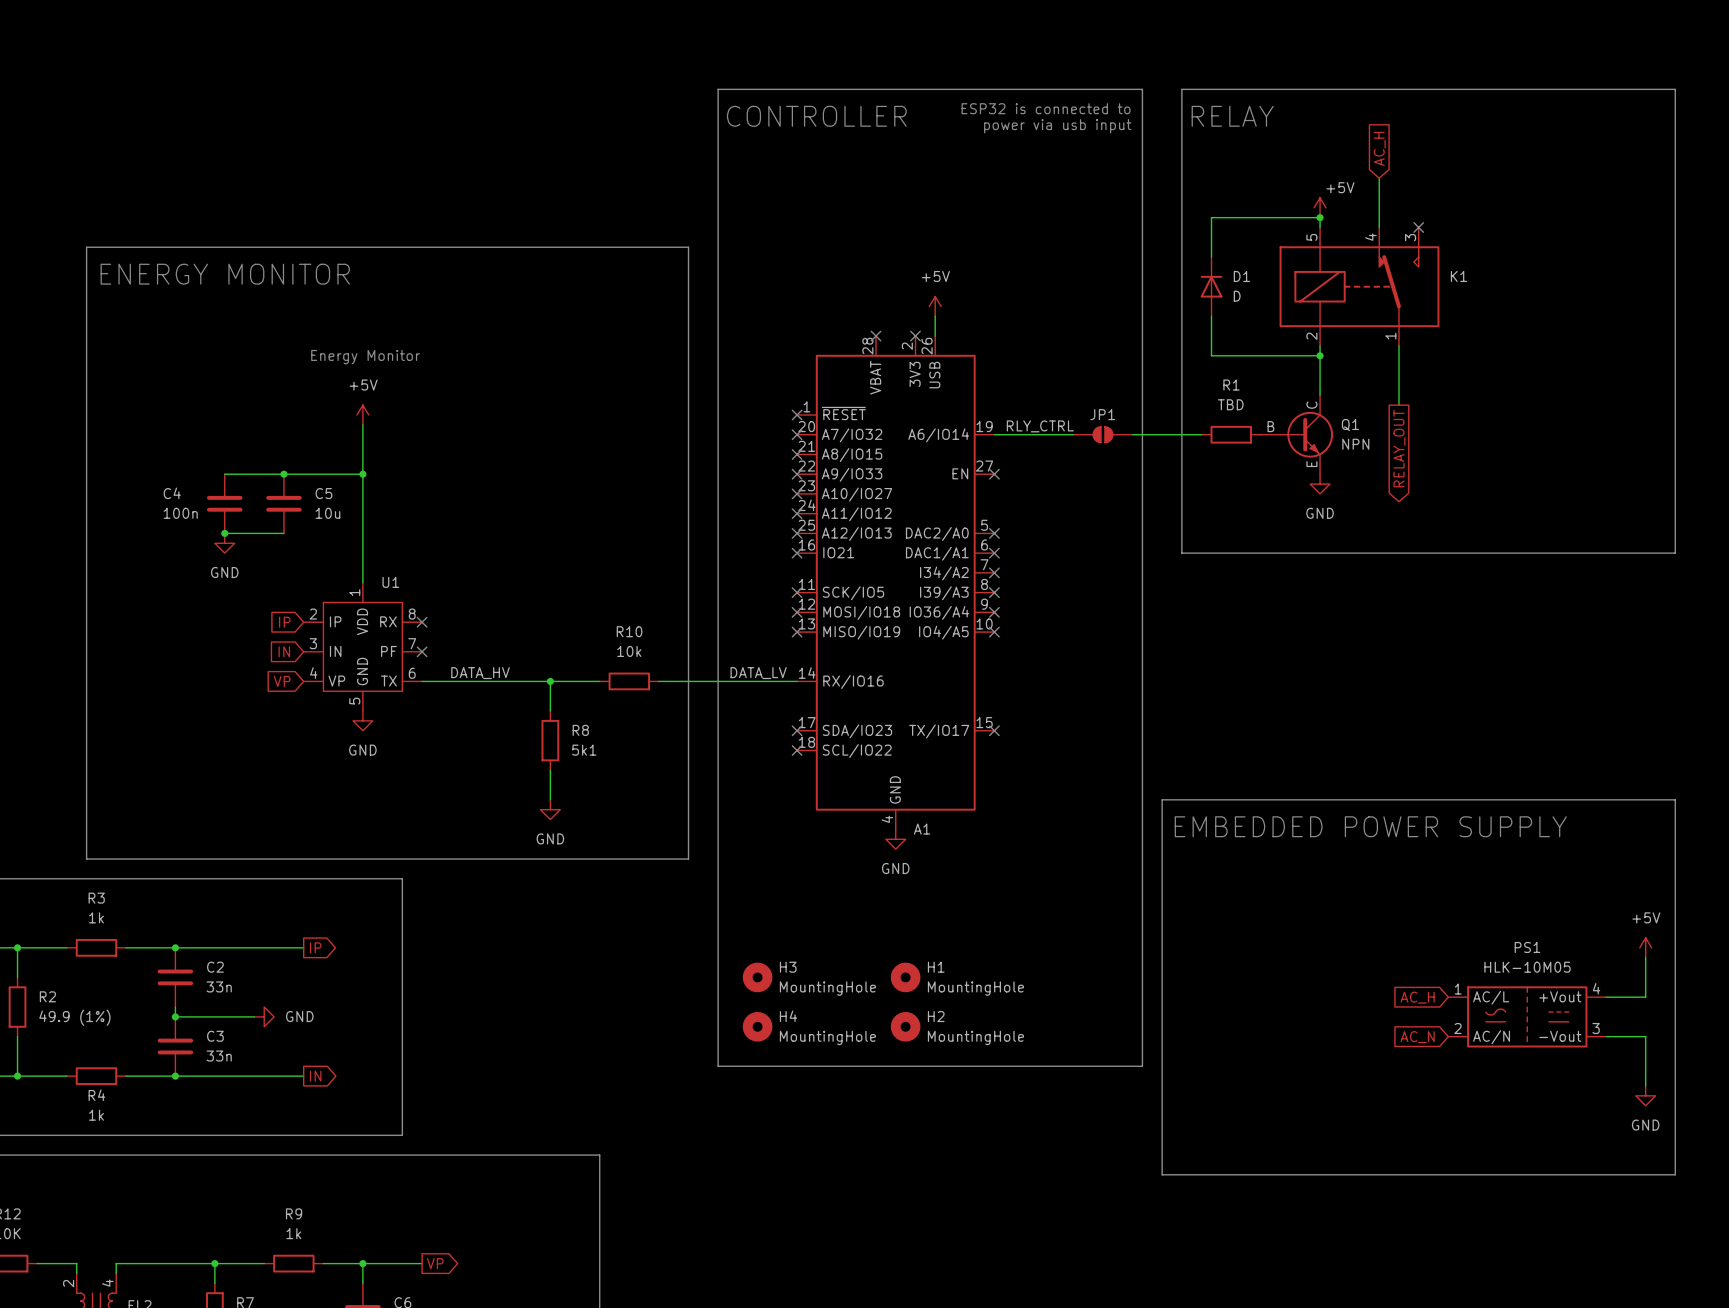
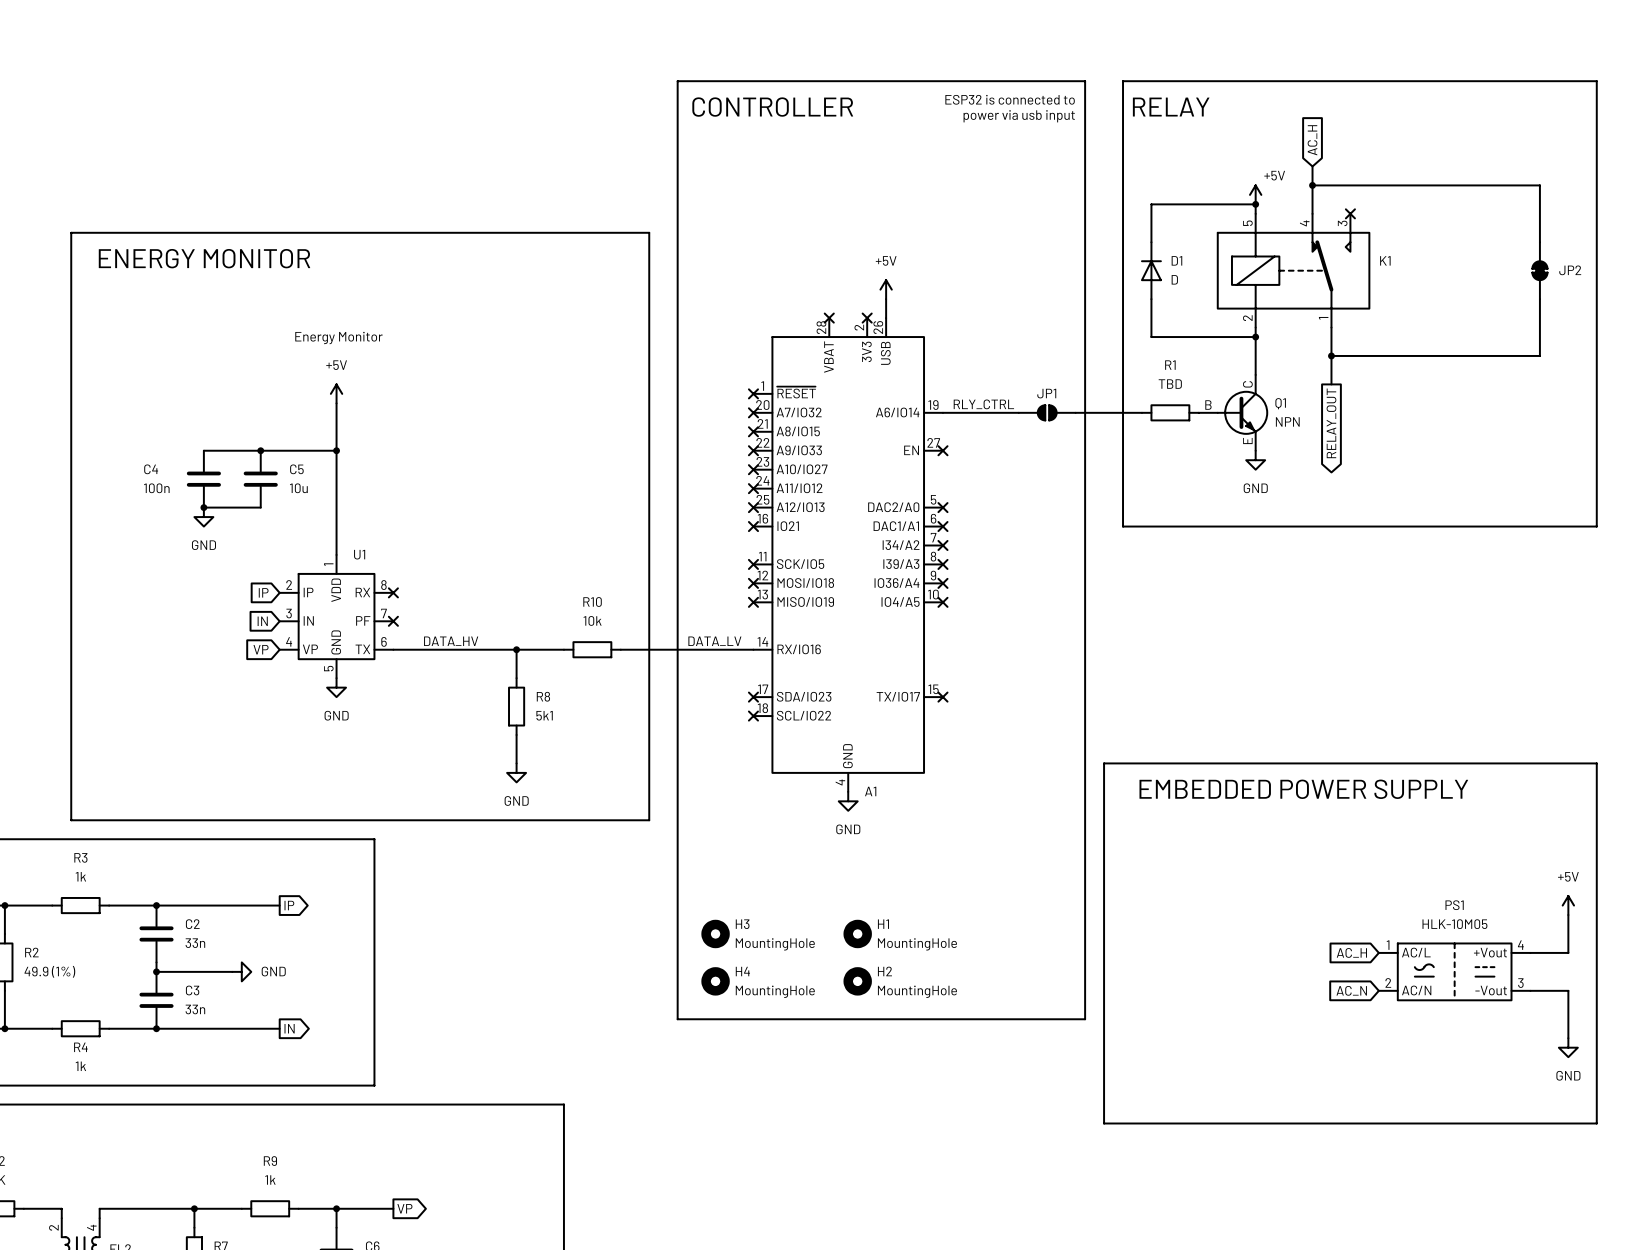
wire: none -> (1312, 185) (1539, 185) (1539, 242)
junction: none -> (1312, 185)
JP2: none -> (1539, 270)
wire: none -> (1539, 299) (1539, 355) (1331, 355)
junction: none -> (1331, 355)

